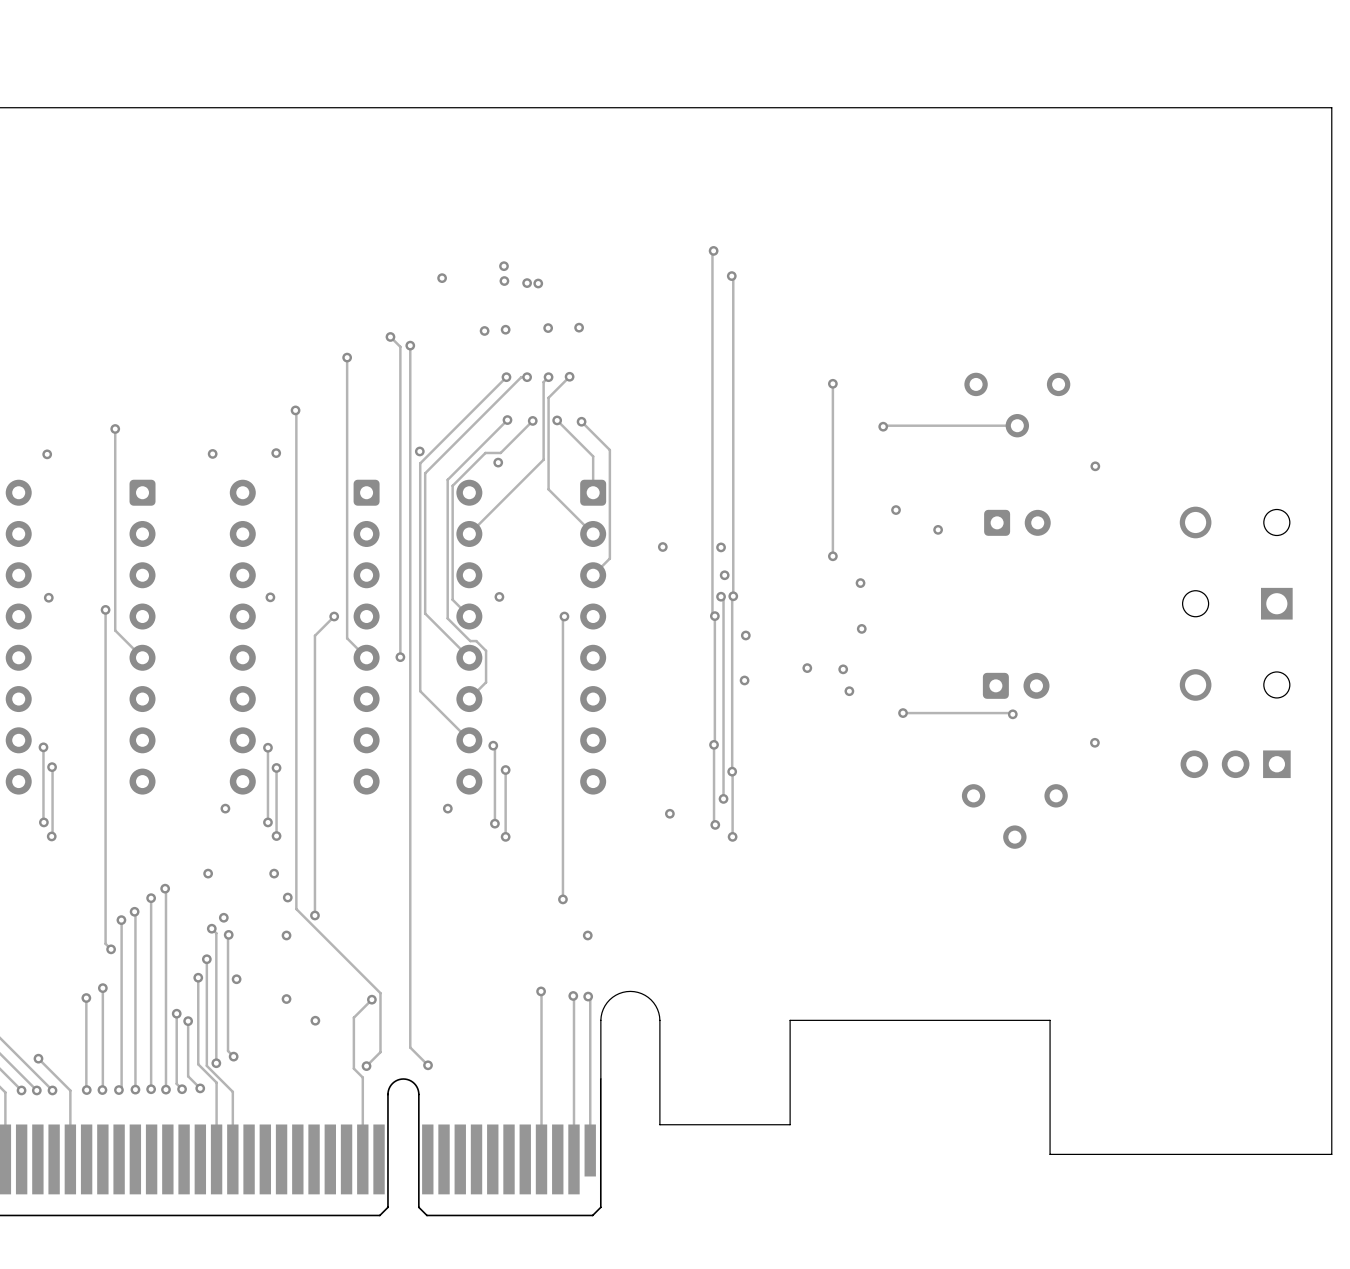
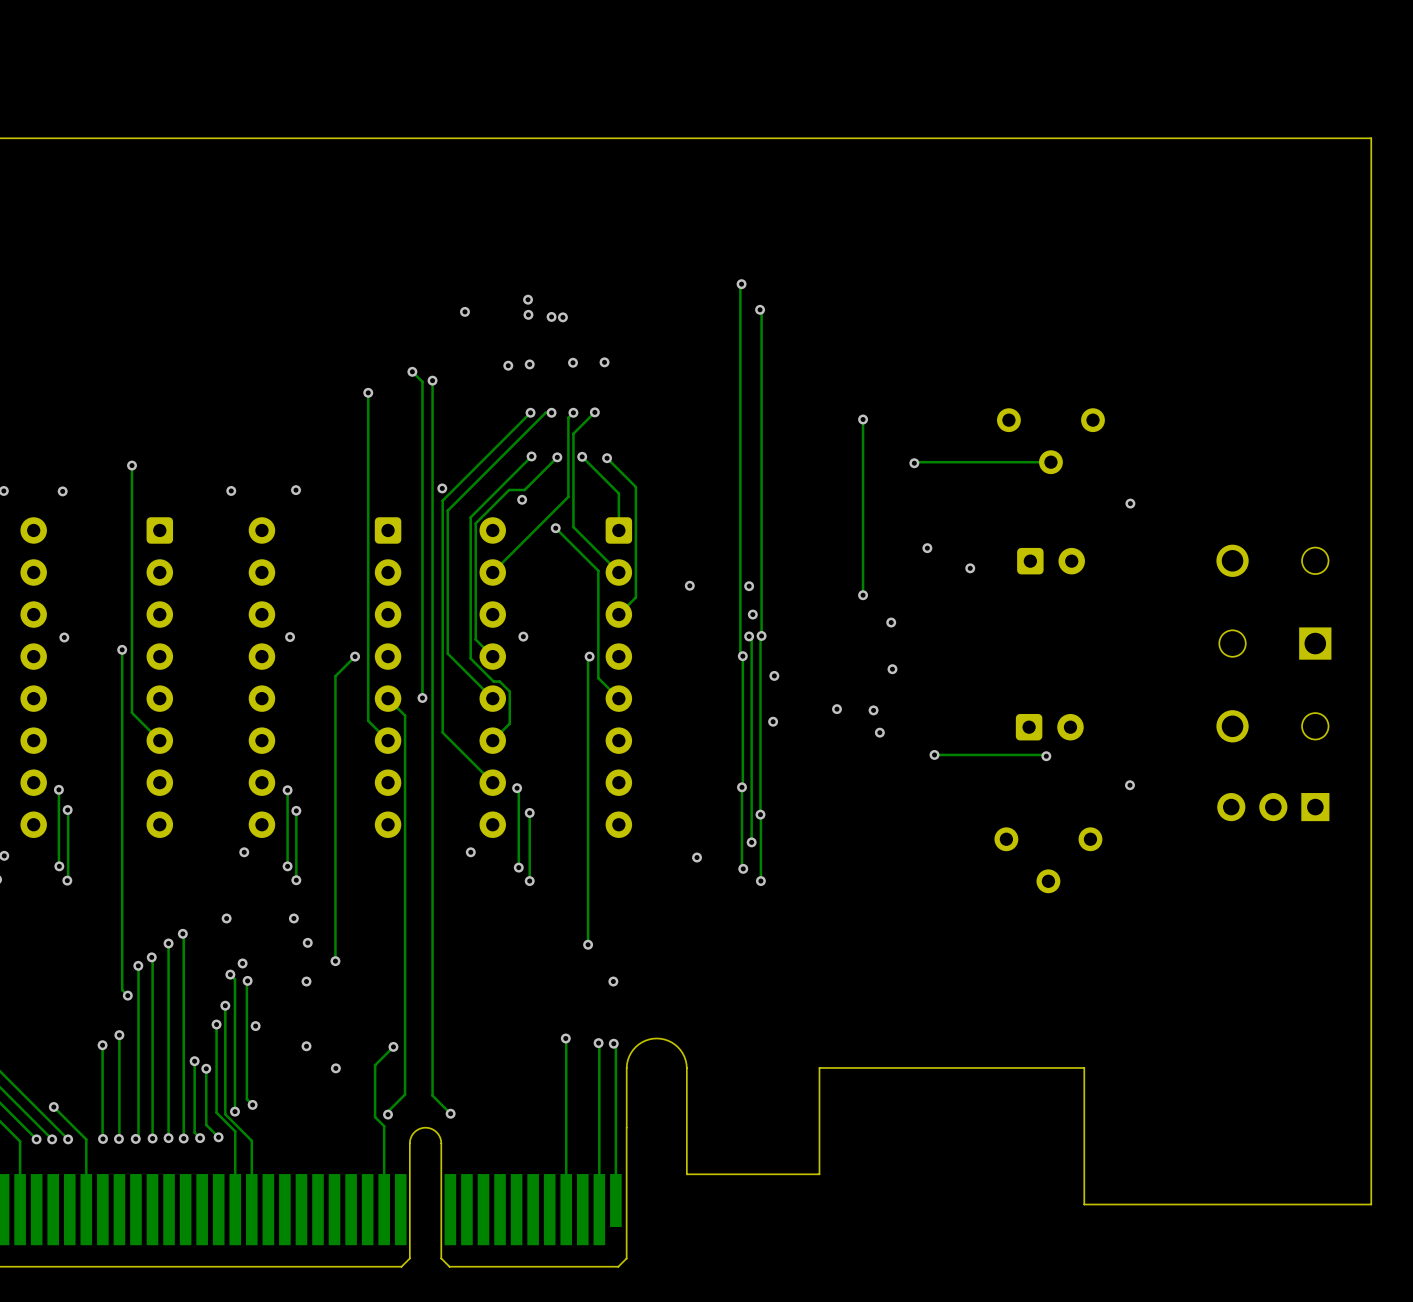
track: (295, 410) (296, 909) (380, 993) (380, 1052) (366, 1066) -> none
via: (295, 410) -> none
track: none -> (555, 528) (598, 570) (598, 678) (618, 698)
via: none -> (555, 528)
track: (115, 630) (142, 657) -> (132, 670) (132, 712) (159, 740)
track: (347, 638) (366, 657) -> (368, 678) (368, 720) (388, 740)
track: none -> (388, 698) (405, 715) (405, 1094) (385, 1114)

